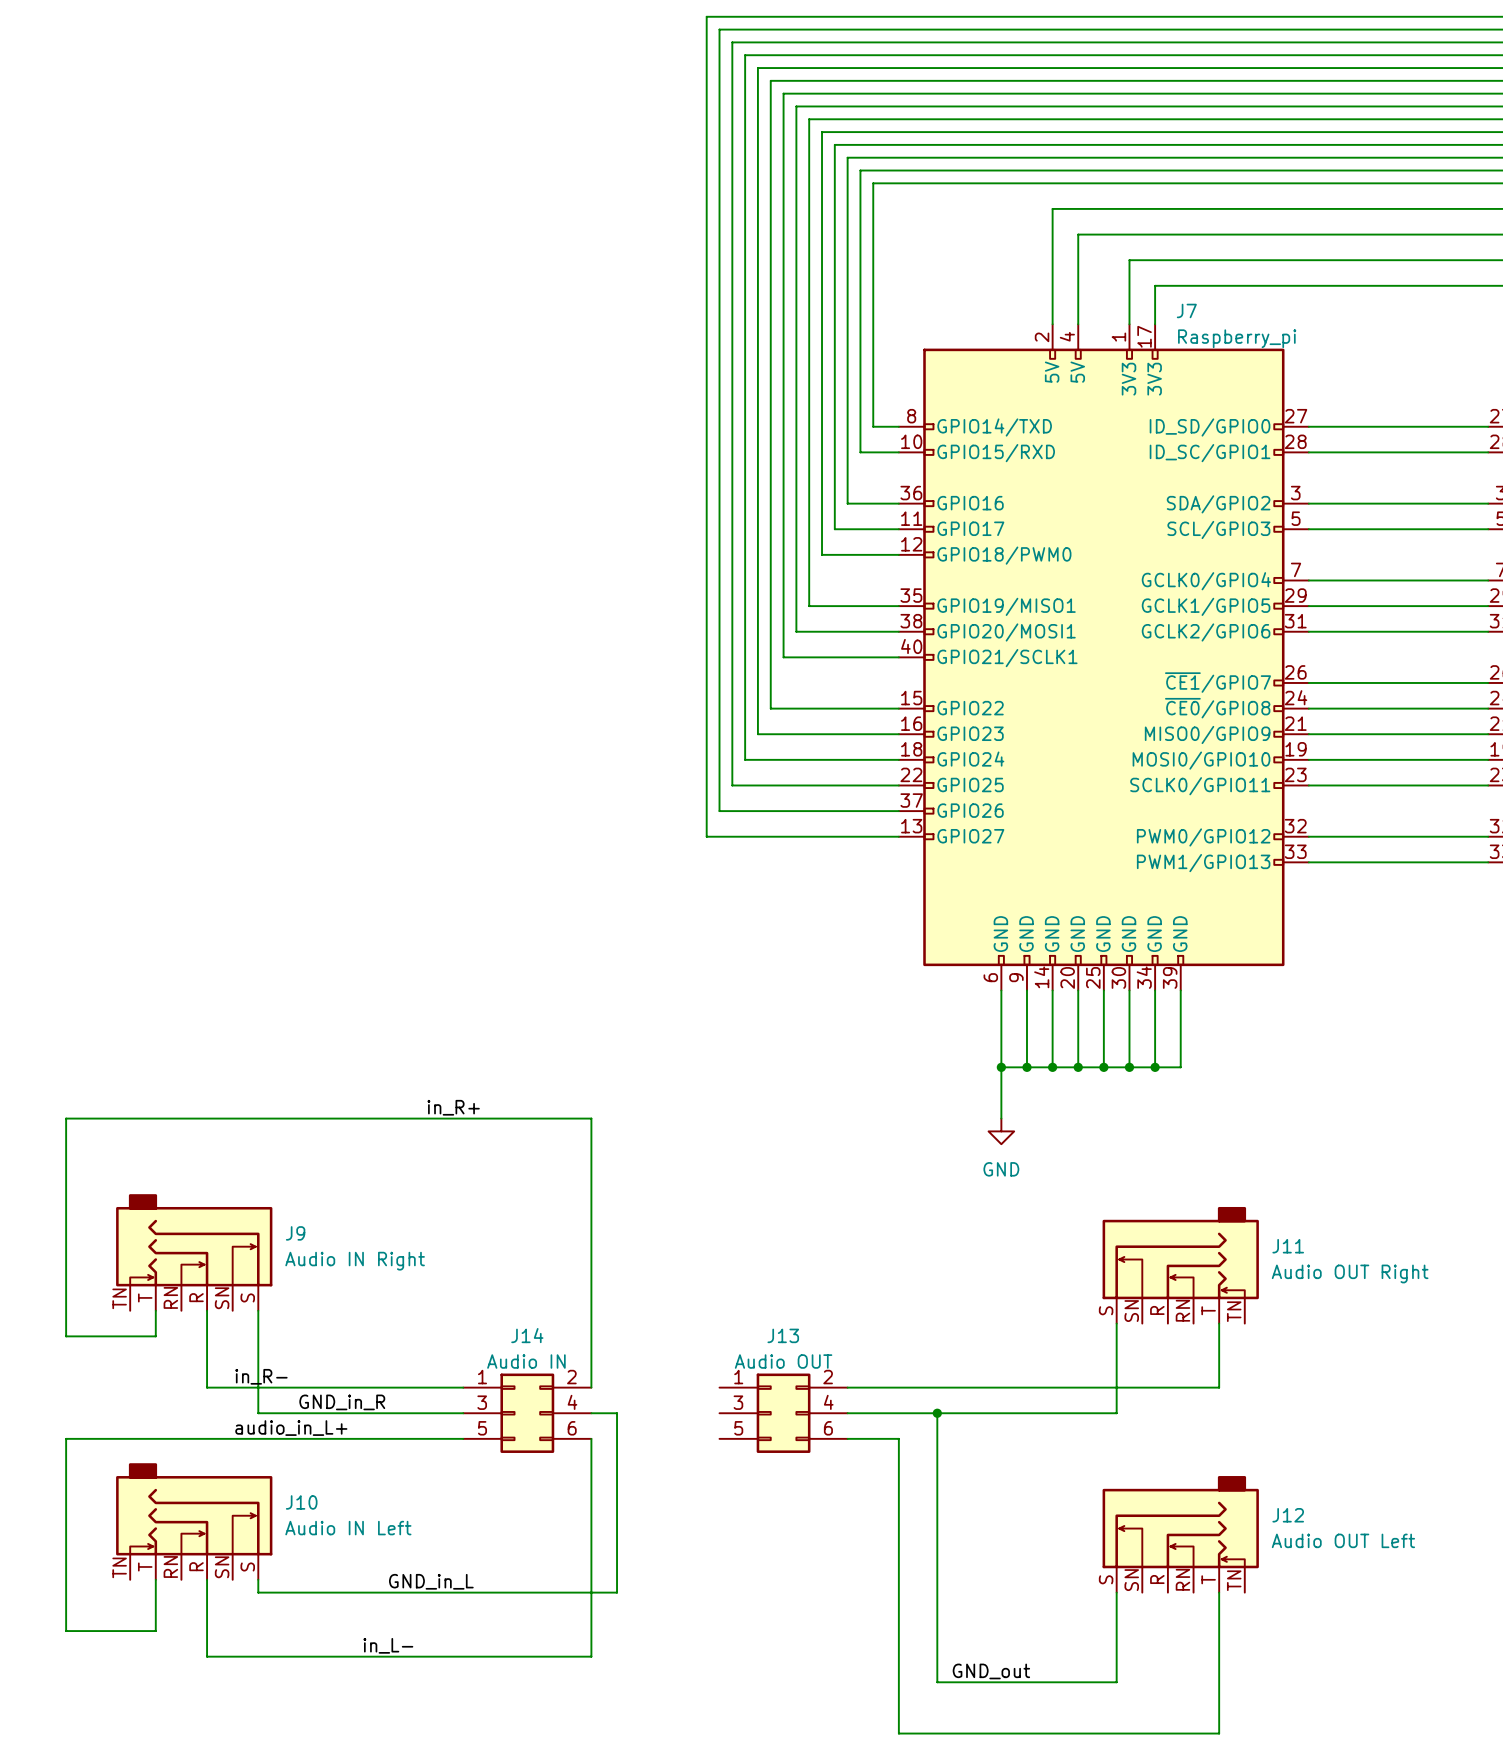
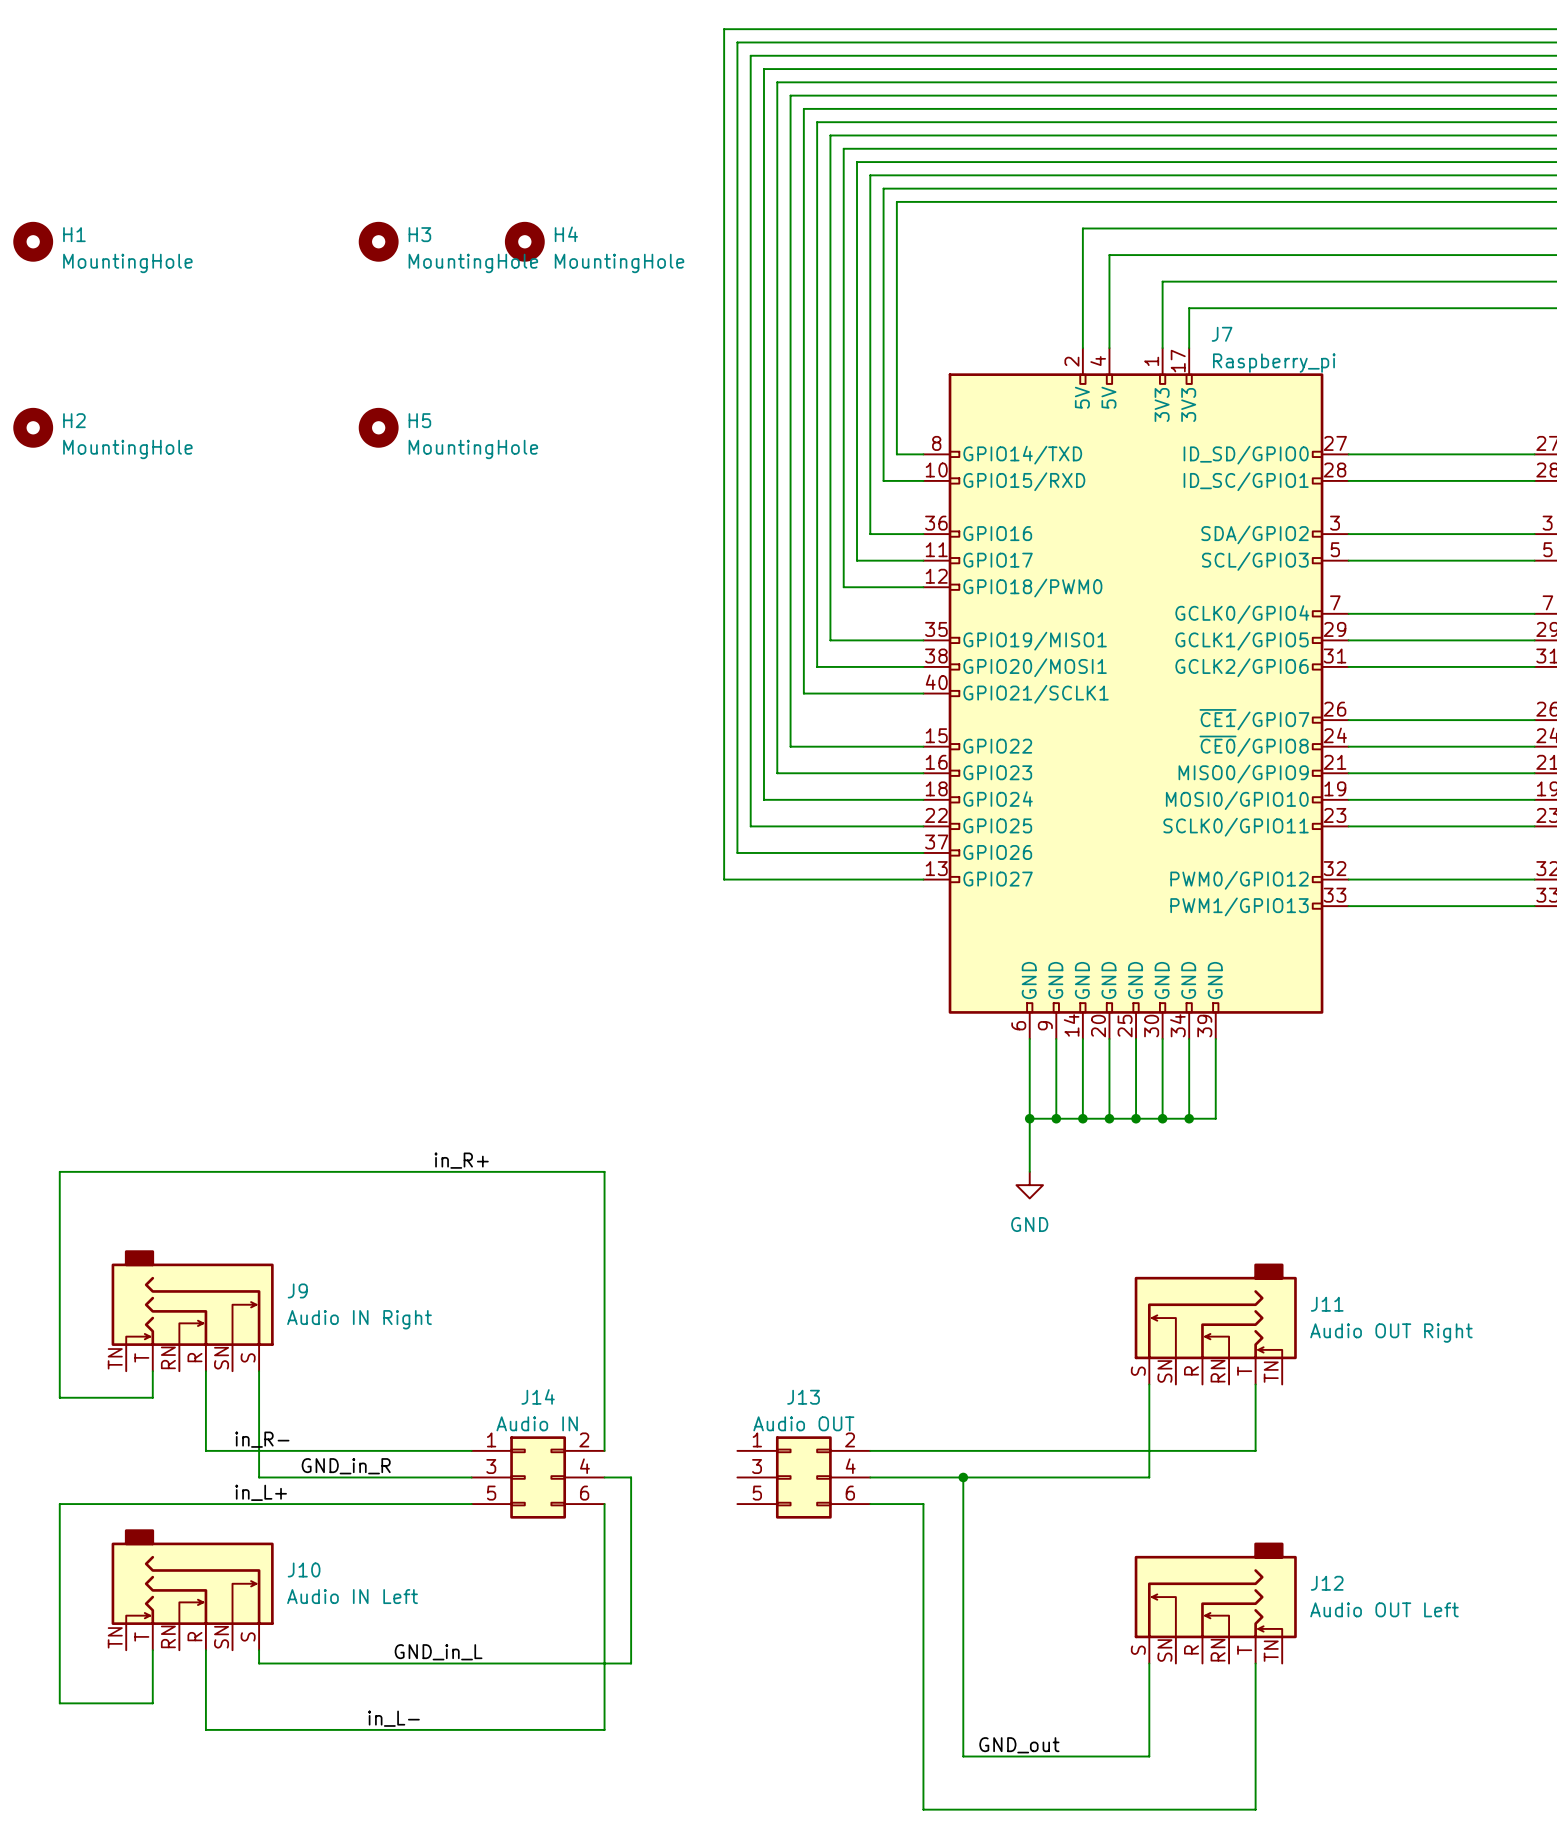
H1: none -> MountingHole (33, 241)
H3: none -> MountingHole (378, 241)
H4: none -> MountingHole (524, 241)
H2: none -> MountingHole (33, 427)
H5: none -> MountingHole (378, 427)
label: audio_in_L+ (291, 1428) -> in_L+ (261, 1492)

